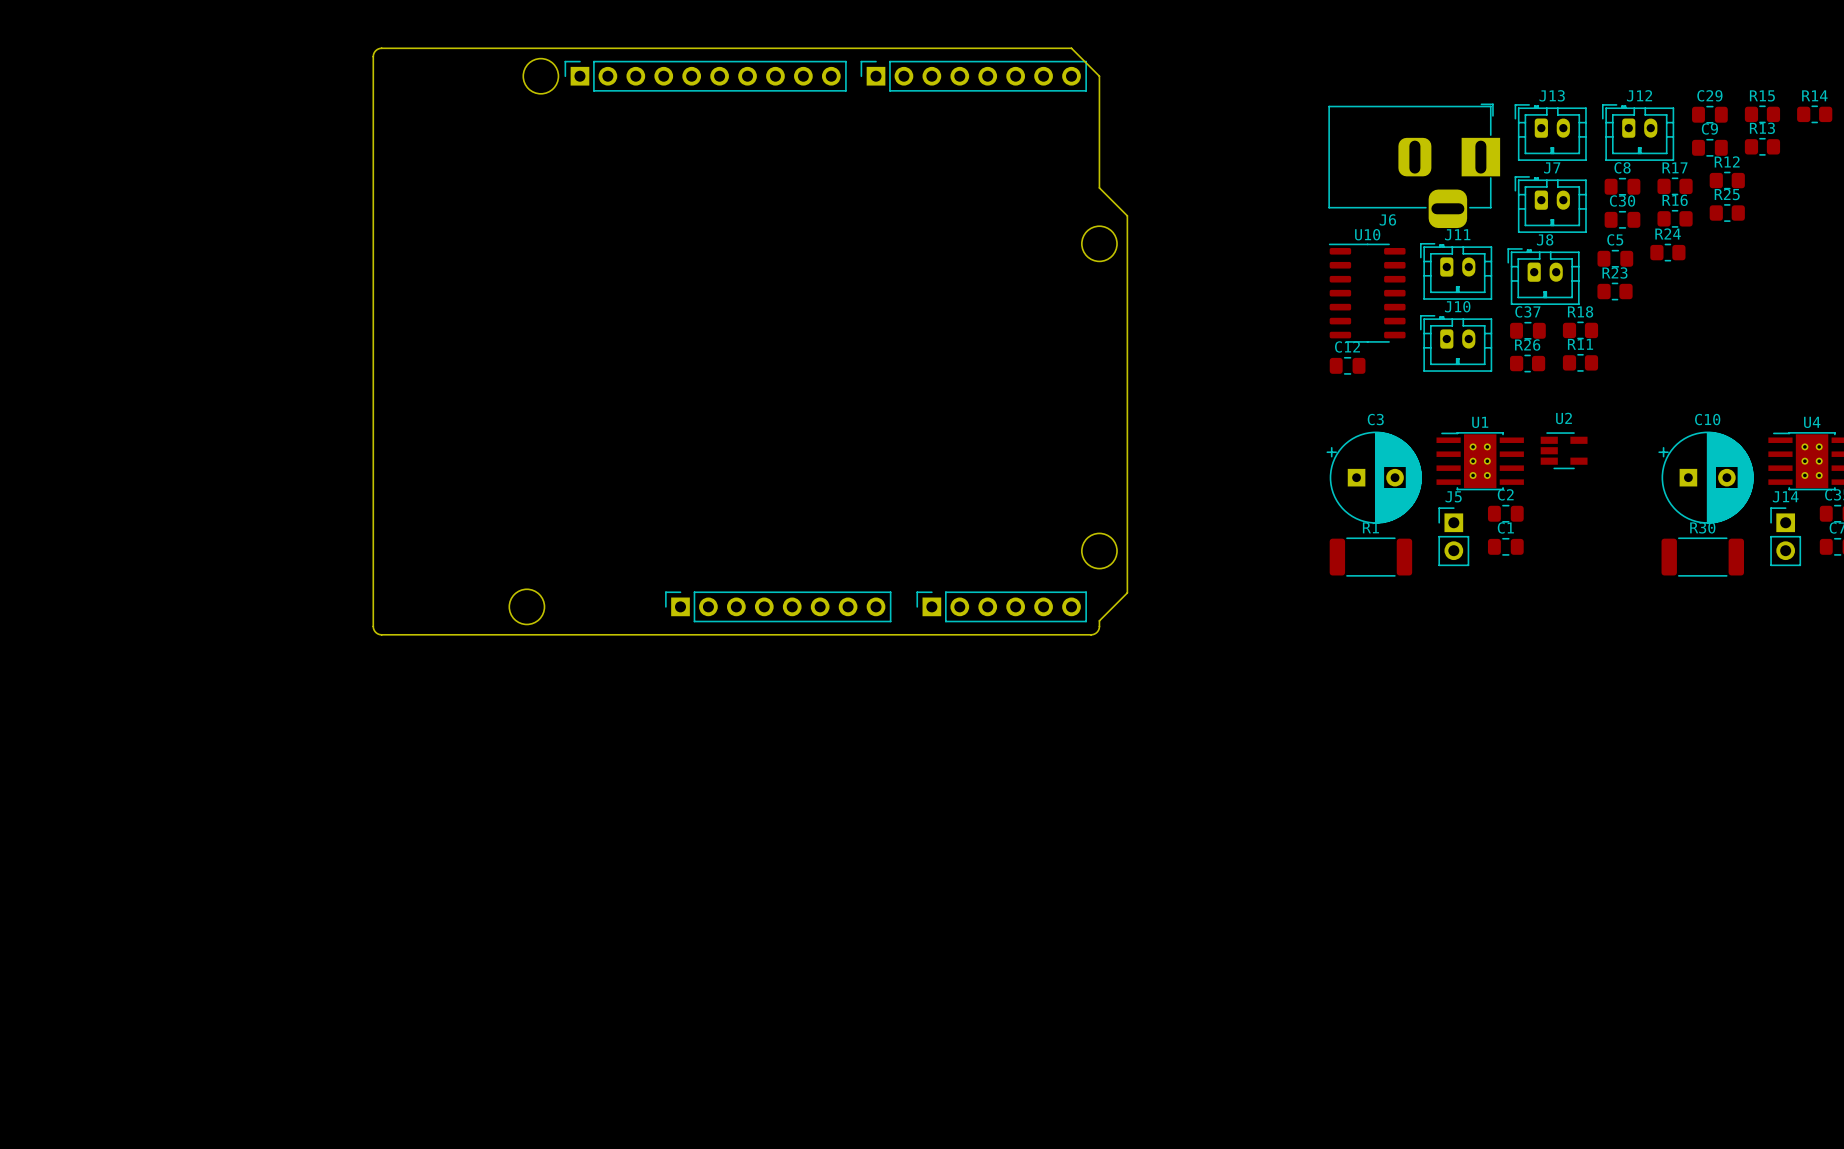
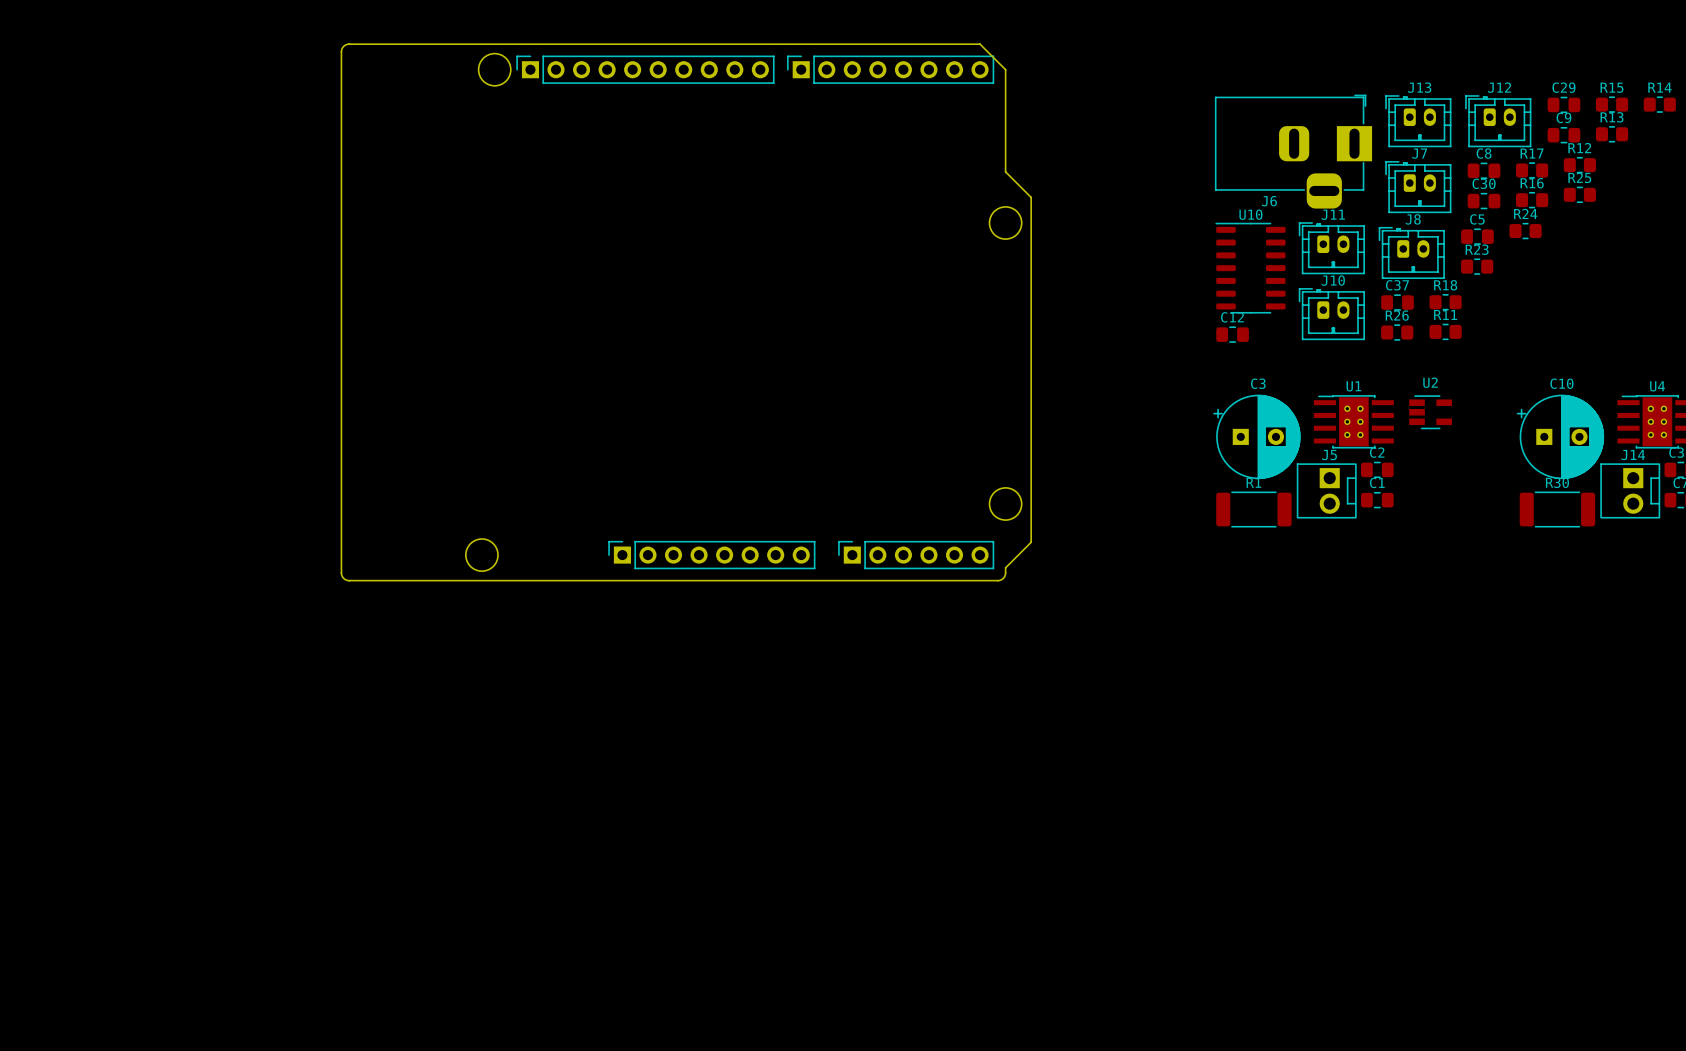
J5 footprint: [1438, 507, 1470, 566] -> [1296, 463, 1357, 519]
J14 footprint: [1770, 507, 1801, 566] -> [1600, 463, 1661, 519]

